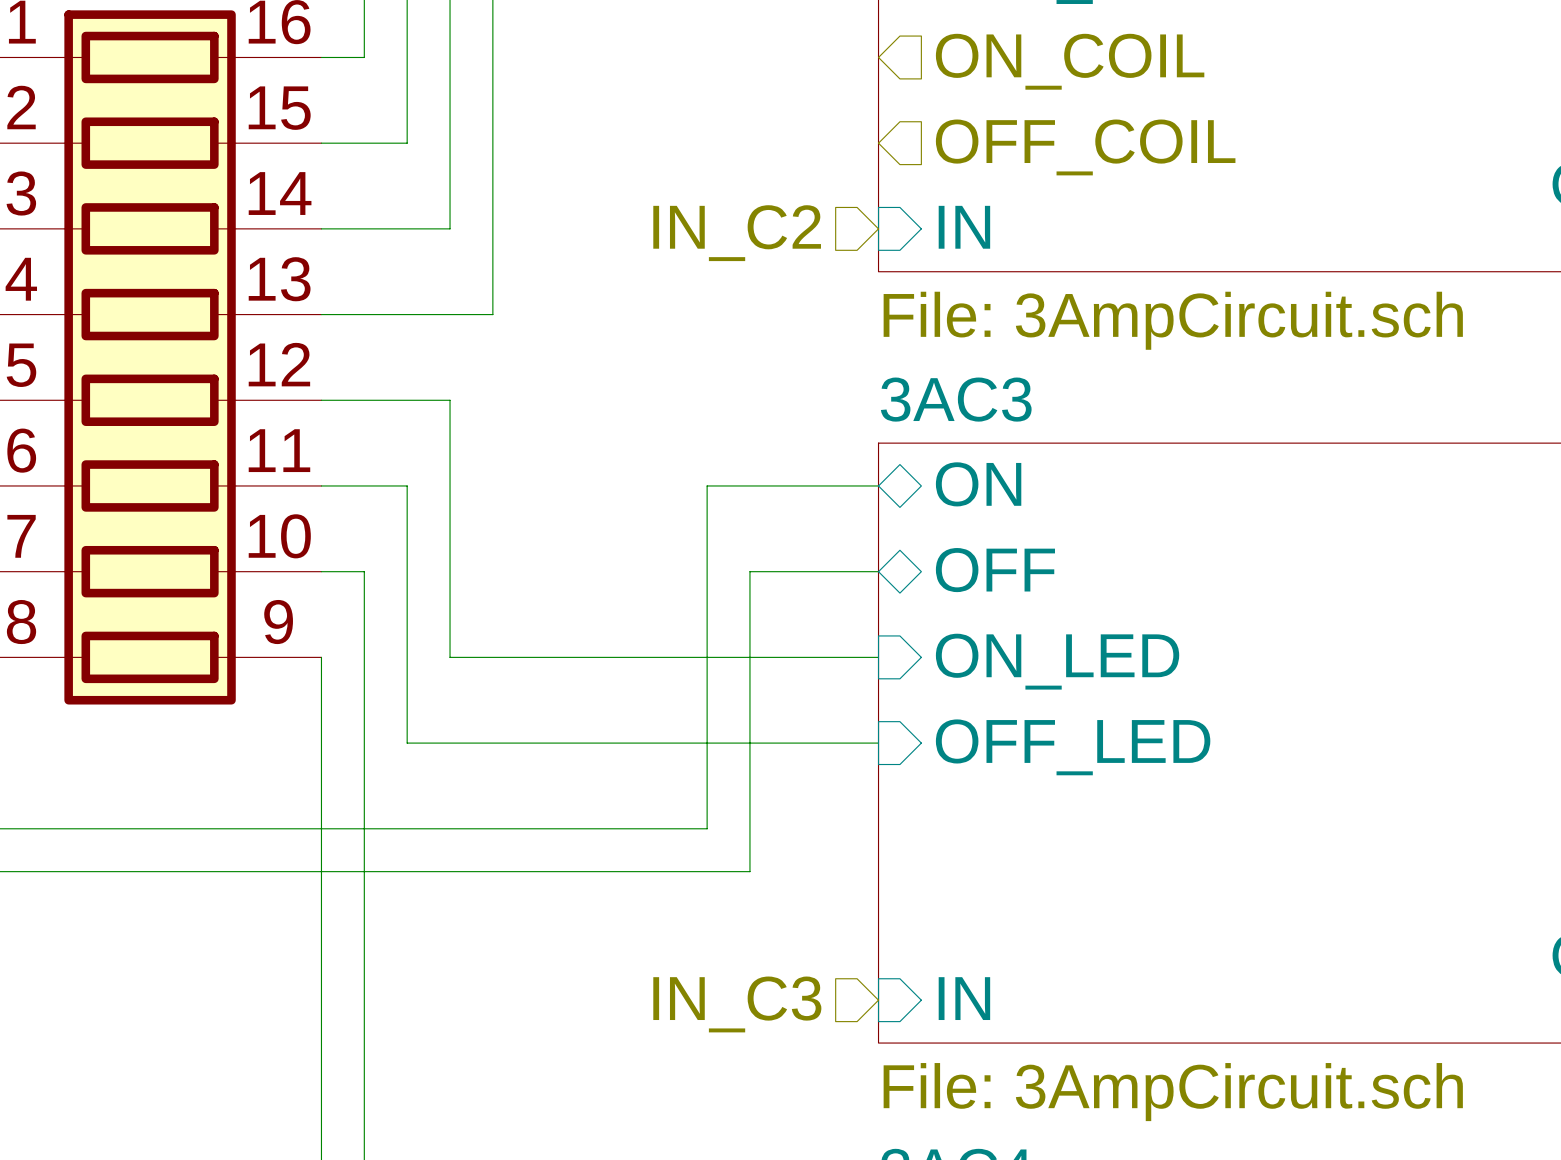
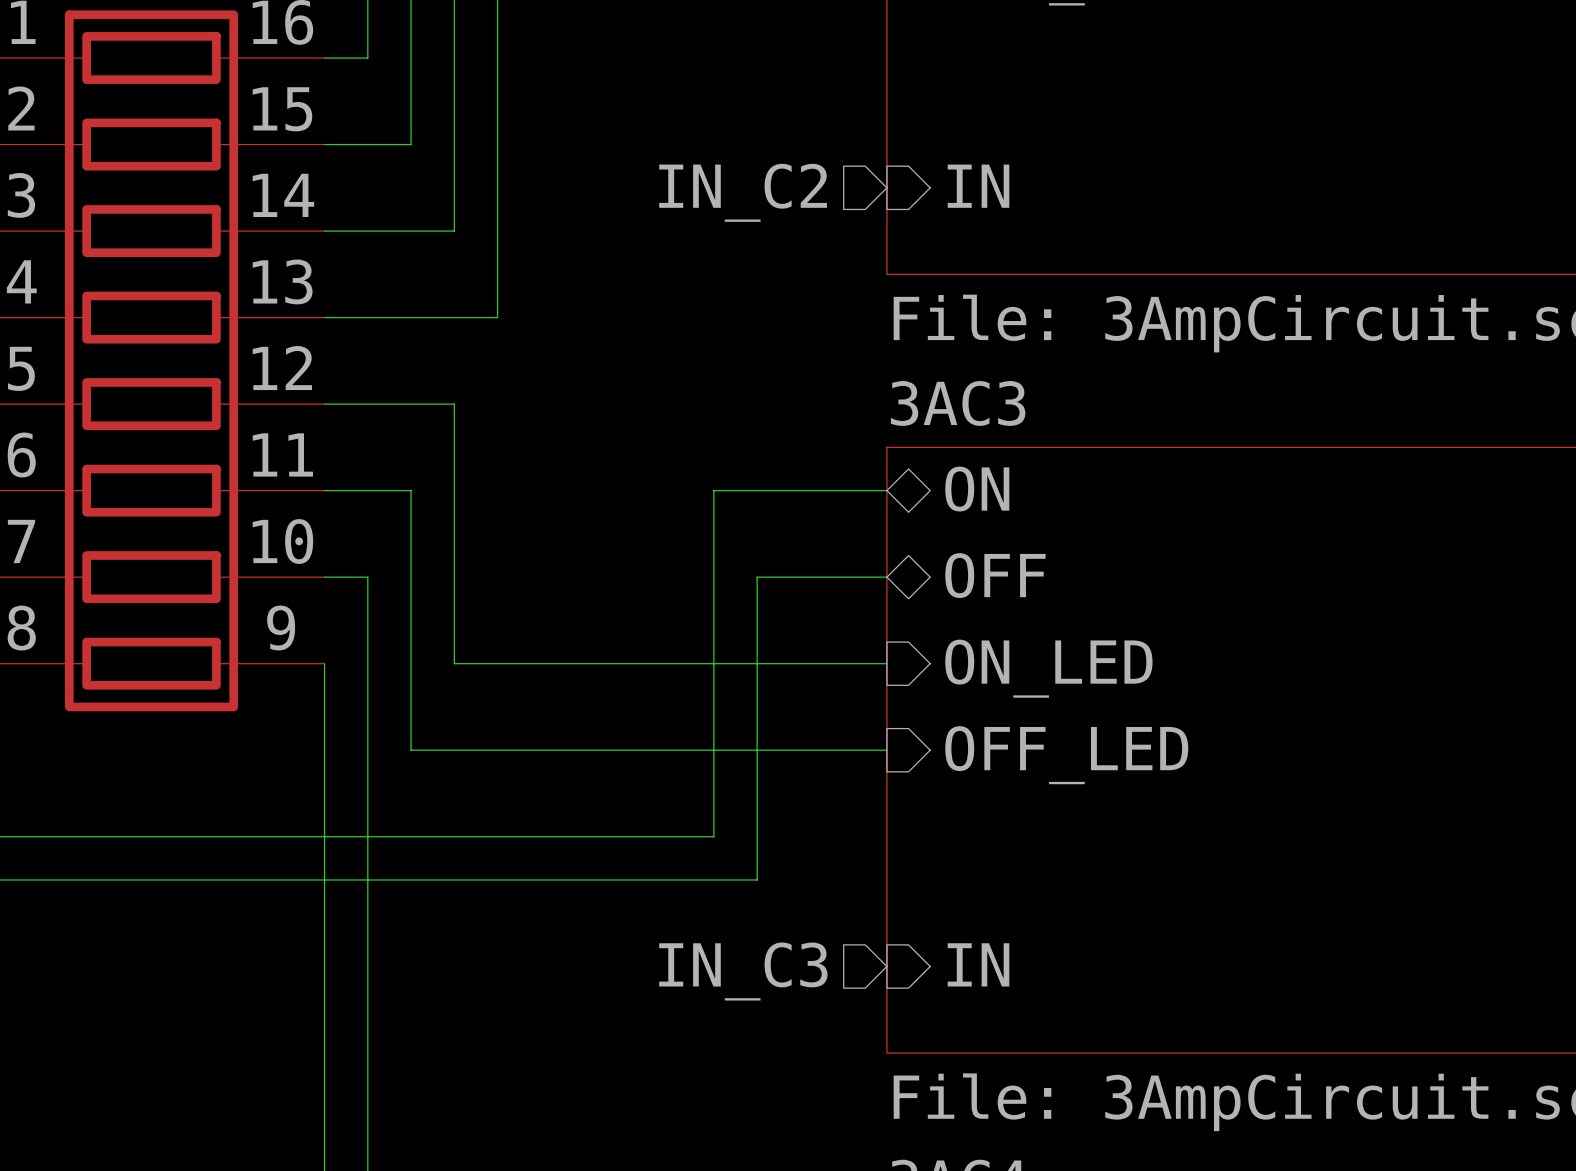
hierarchical label: ON_COIL (1070, 61) -> none
hierarchical label: OFF_COIL (1085, 147) -> none
sheet pin position: IN (964, 227) -> IN (978, 186)
hierarchical label position: IN_C2 (737, 233) -> IN_C2 (743, 192)
sheet pin position: IN (964, 998) -> IN (978, 964)
hierarchical label position: IN_C3 (737, 1004) -> IN_C3 (743, 971)

